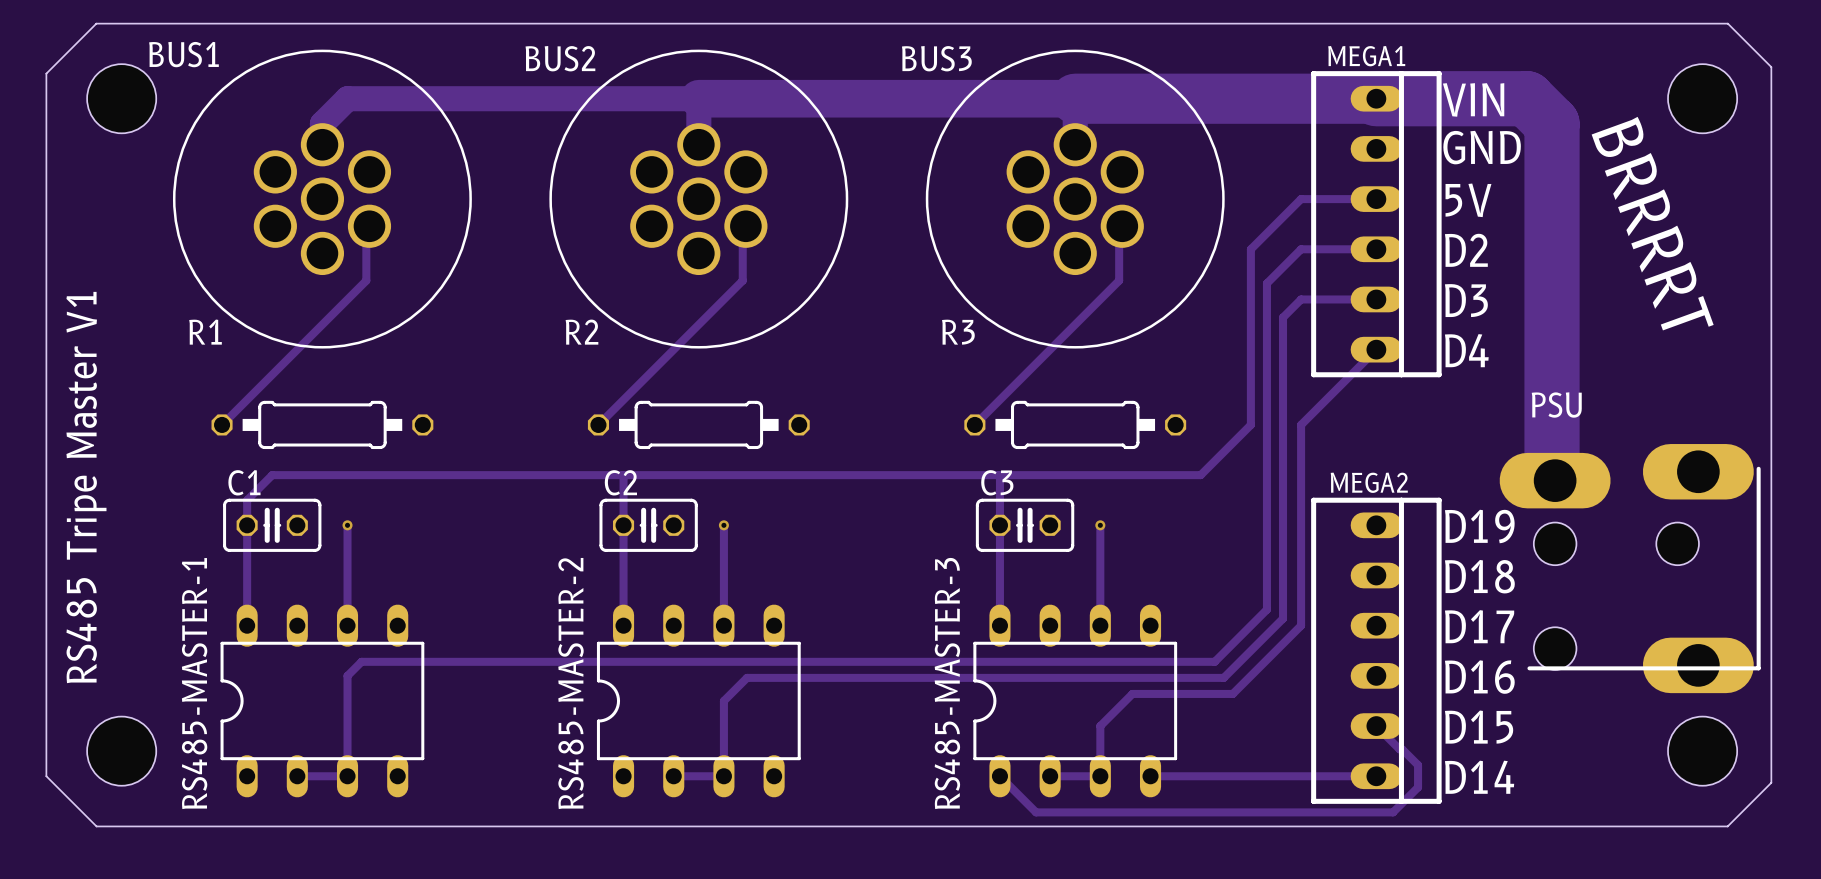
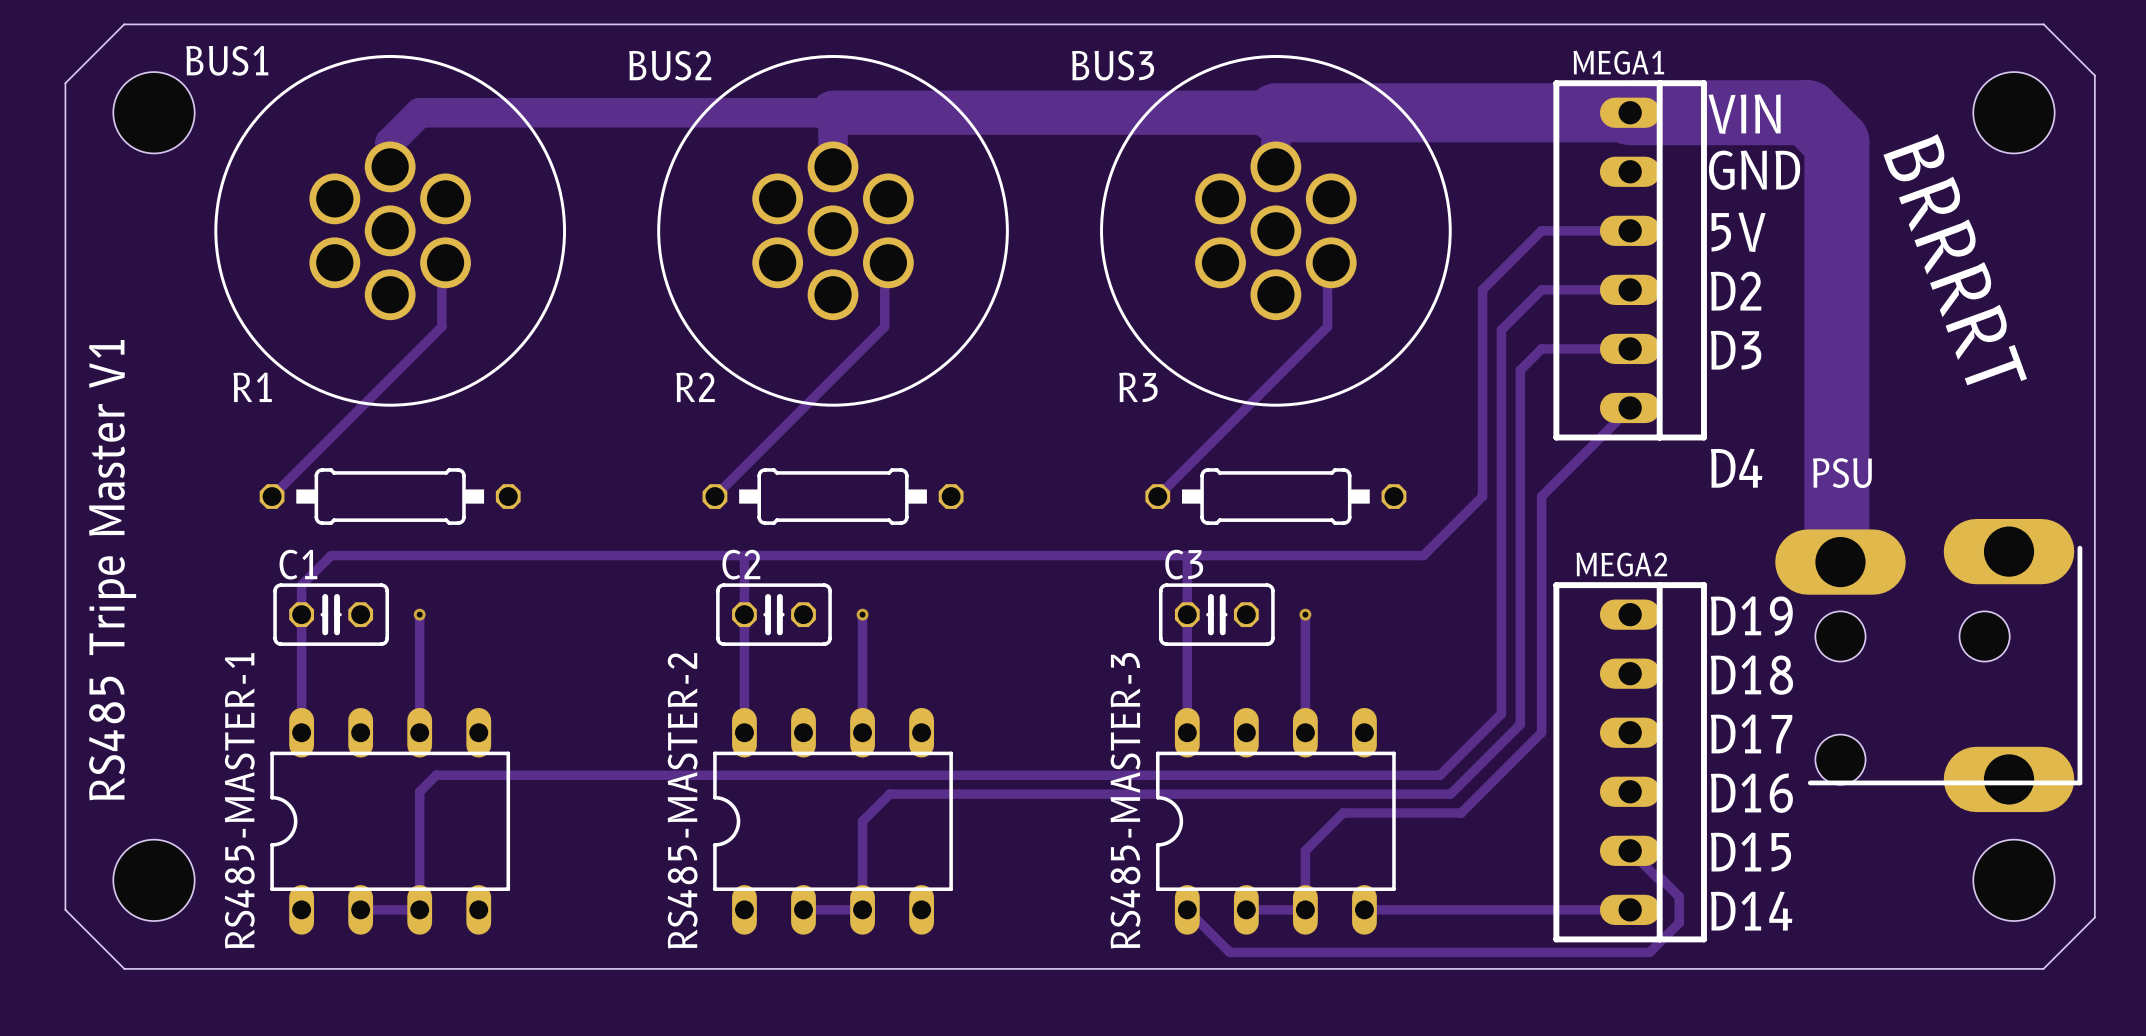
text position: D4 (1466, 350) -> D4 (1736, 468)

